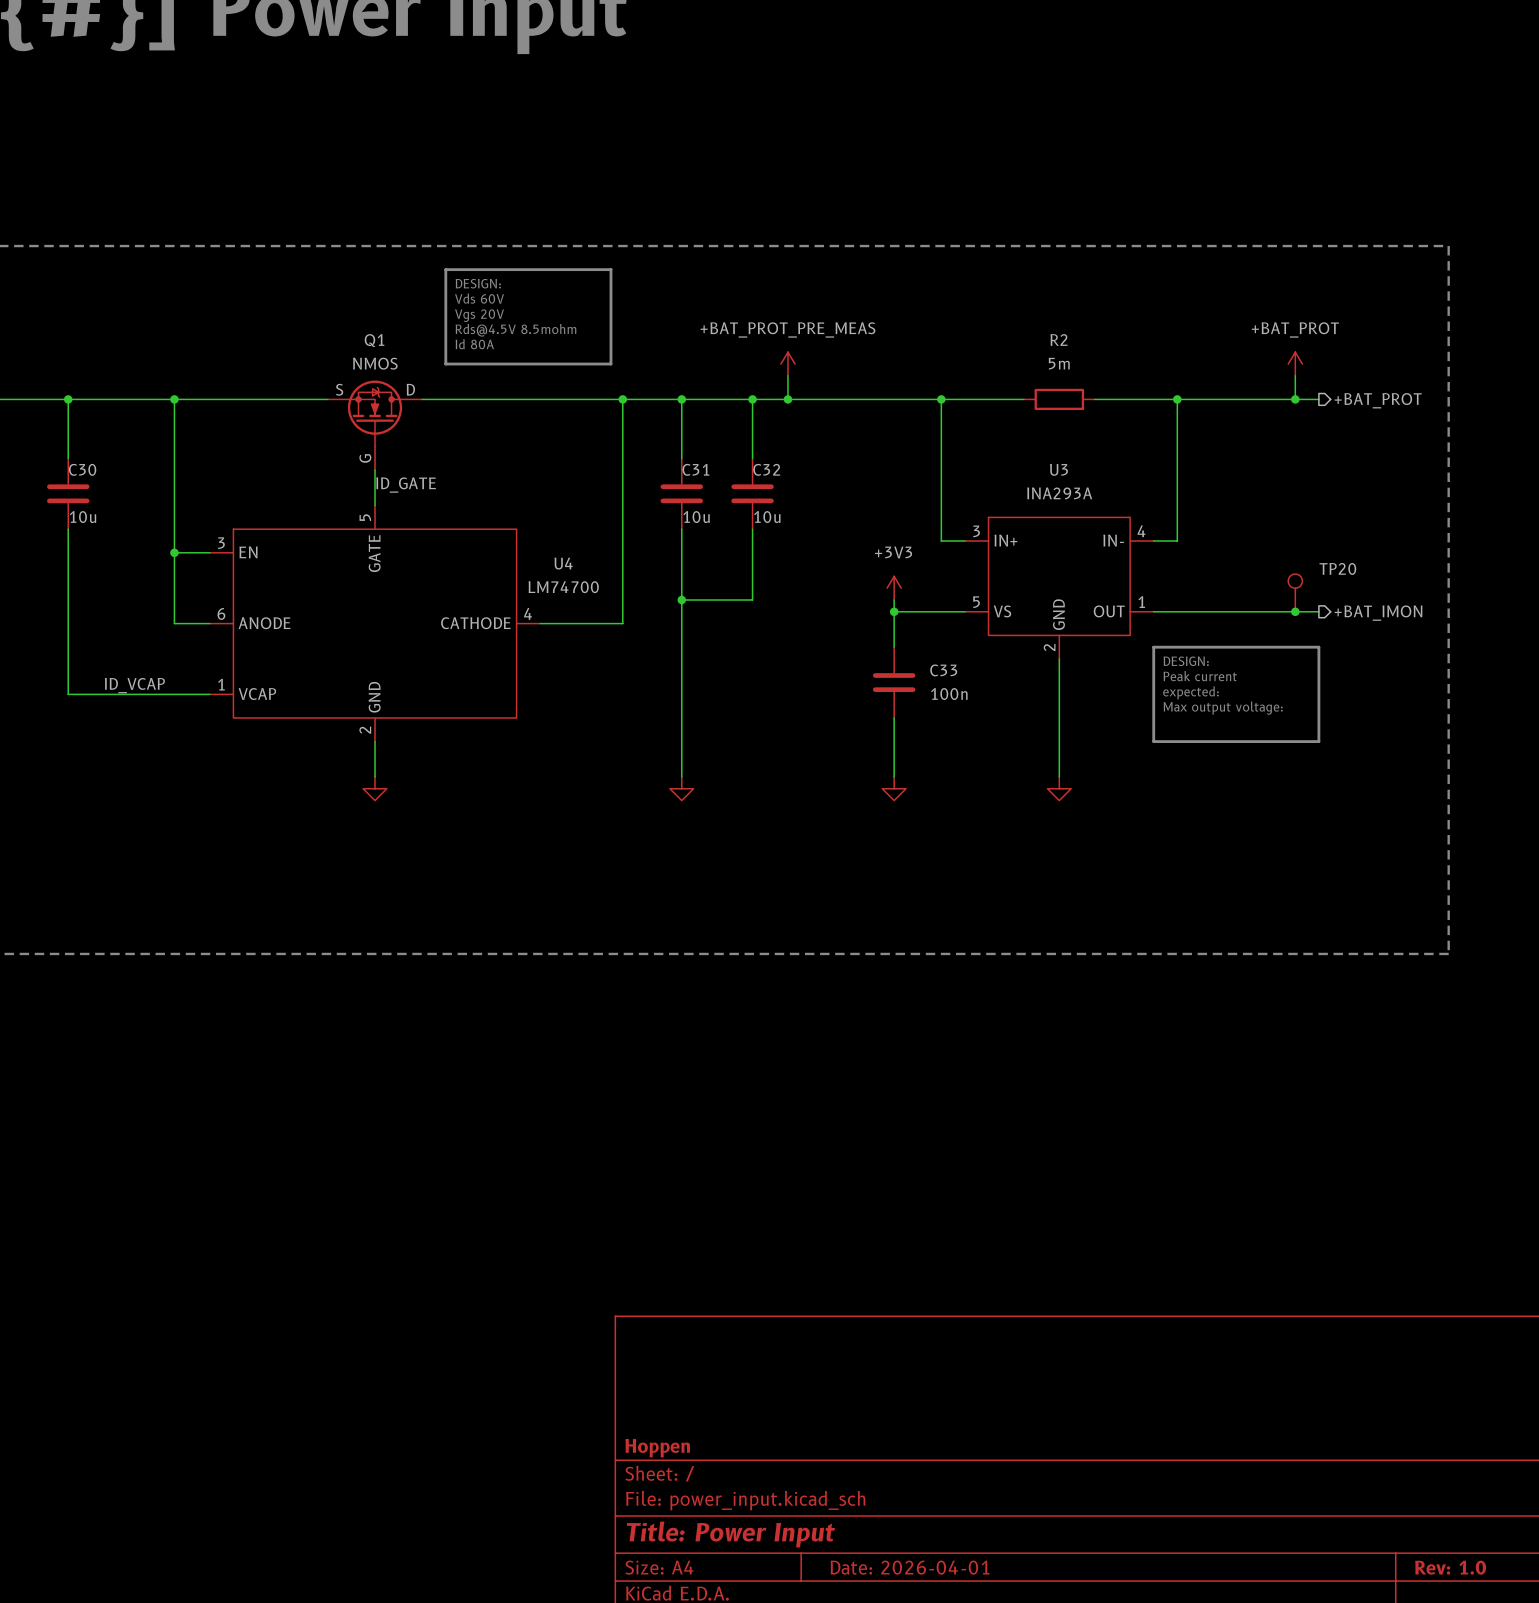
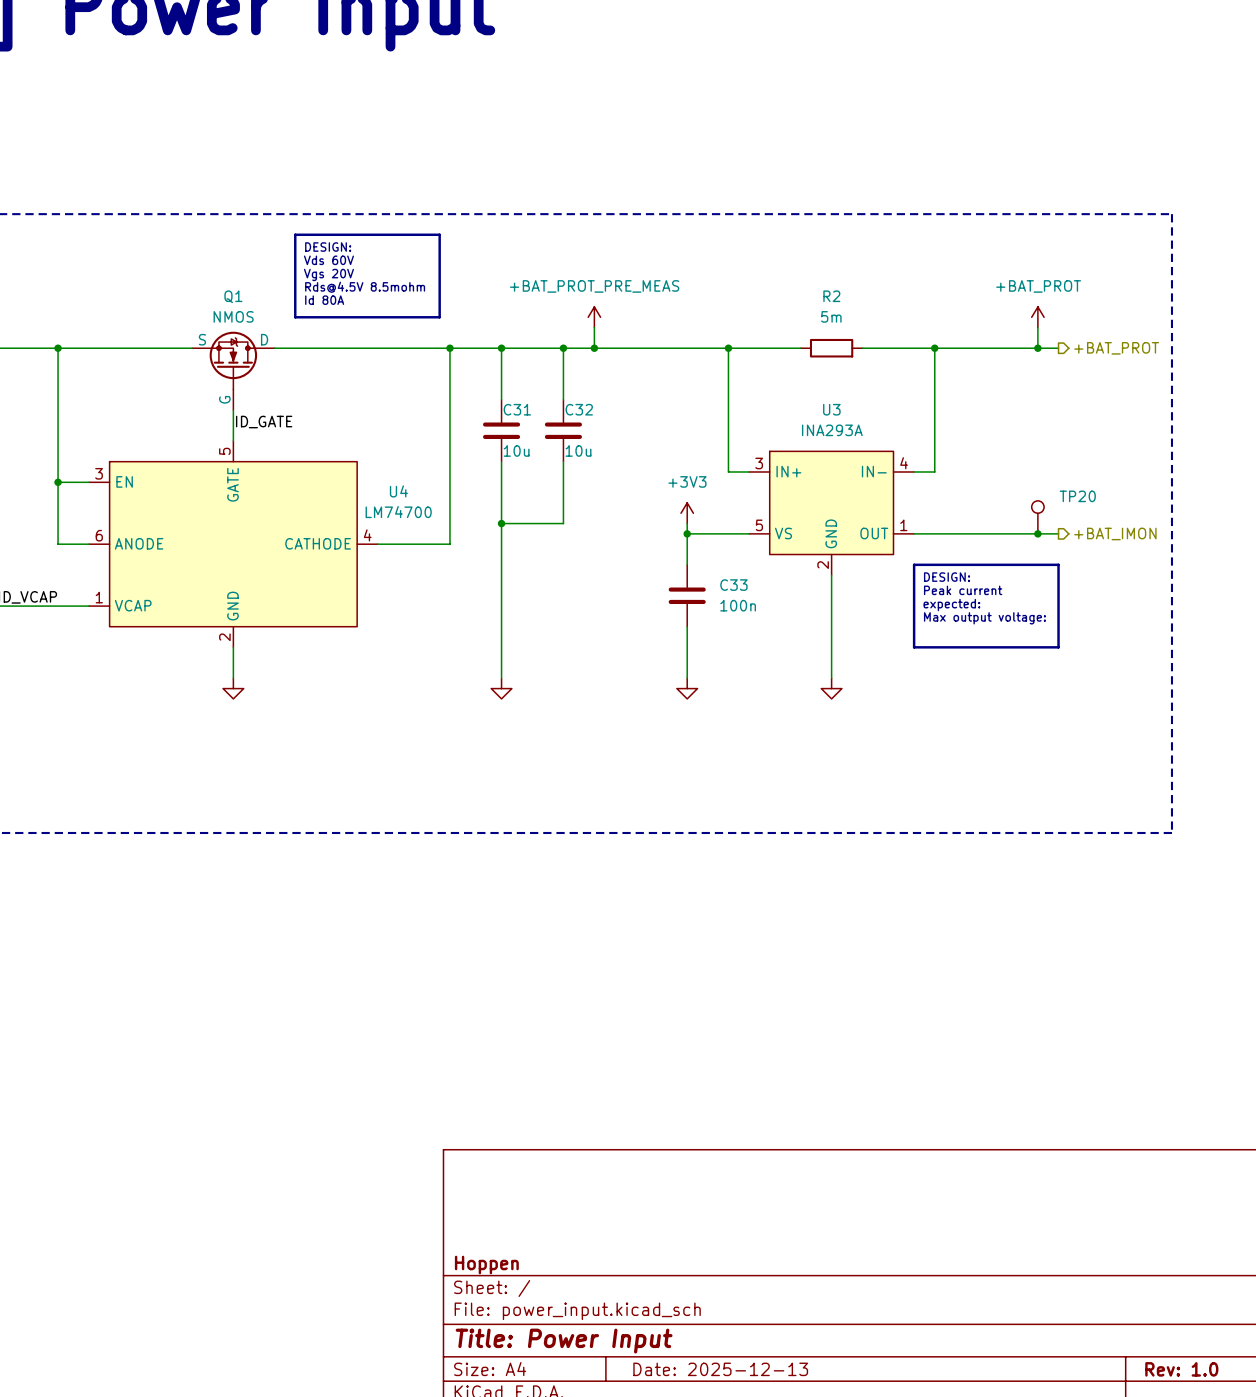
title block: Date: 2026-04-01 (910, 1567) -> Date: 2025-12-13 (720, 1369)

